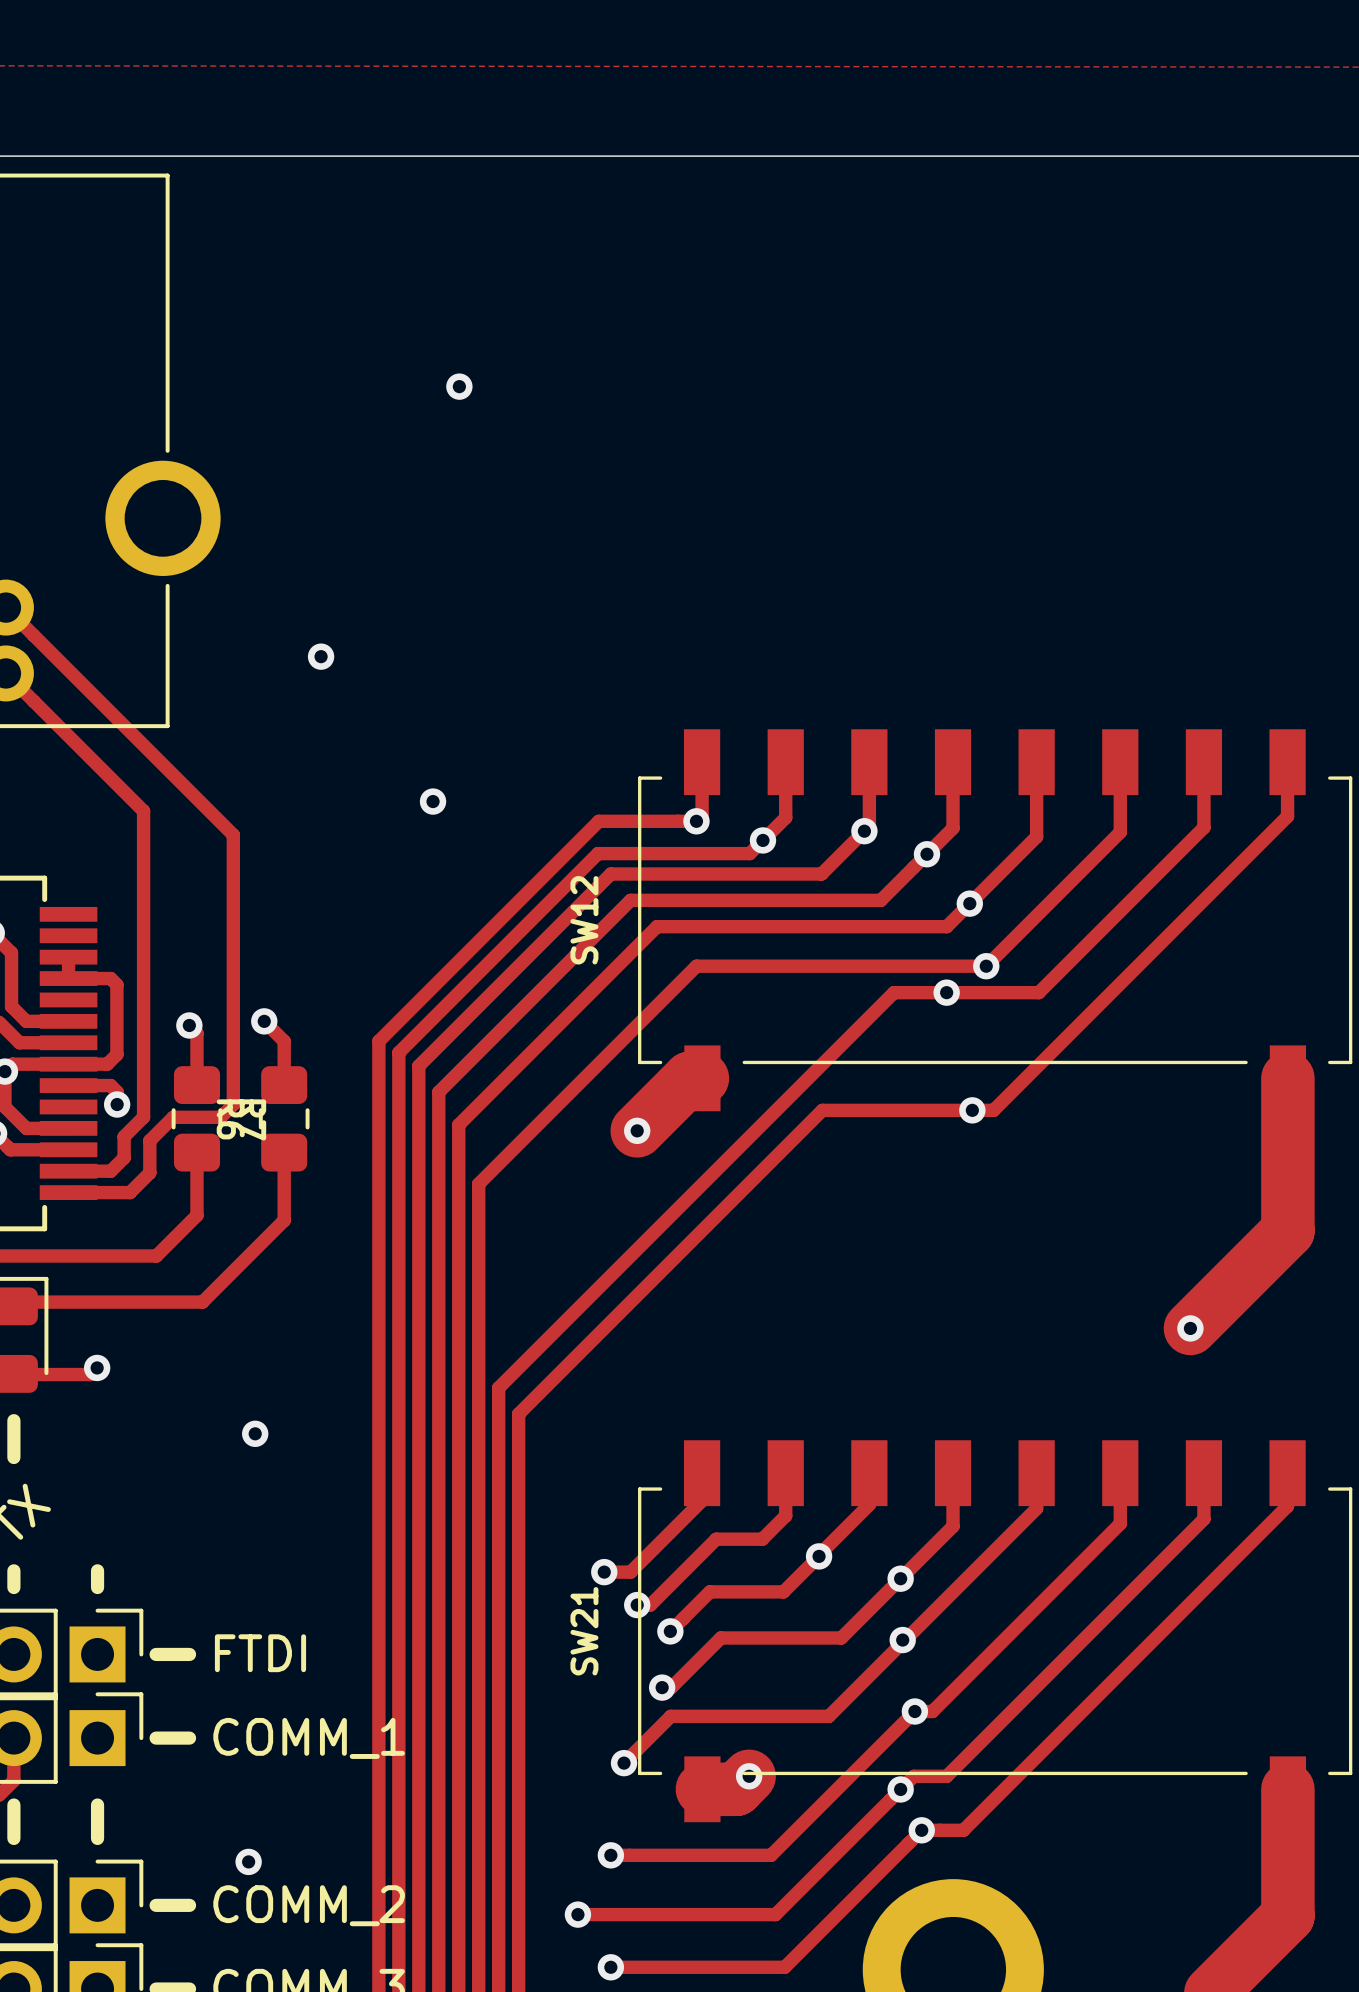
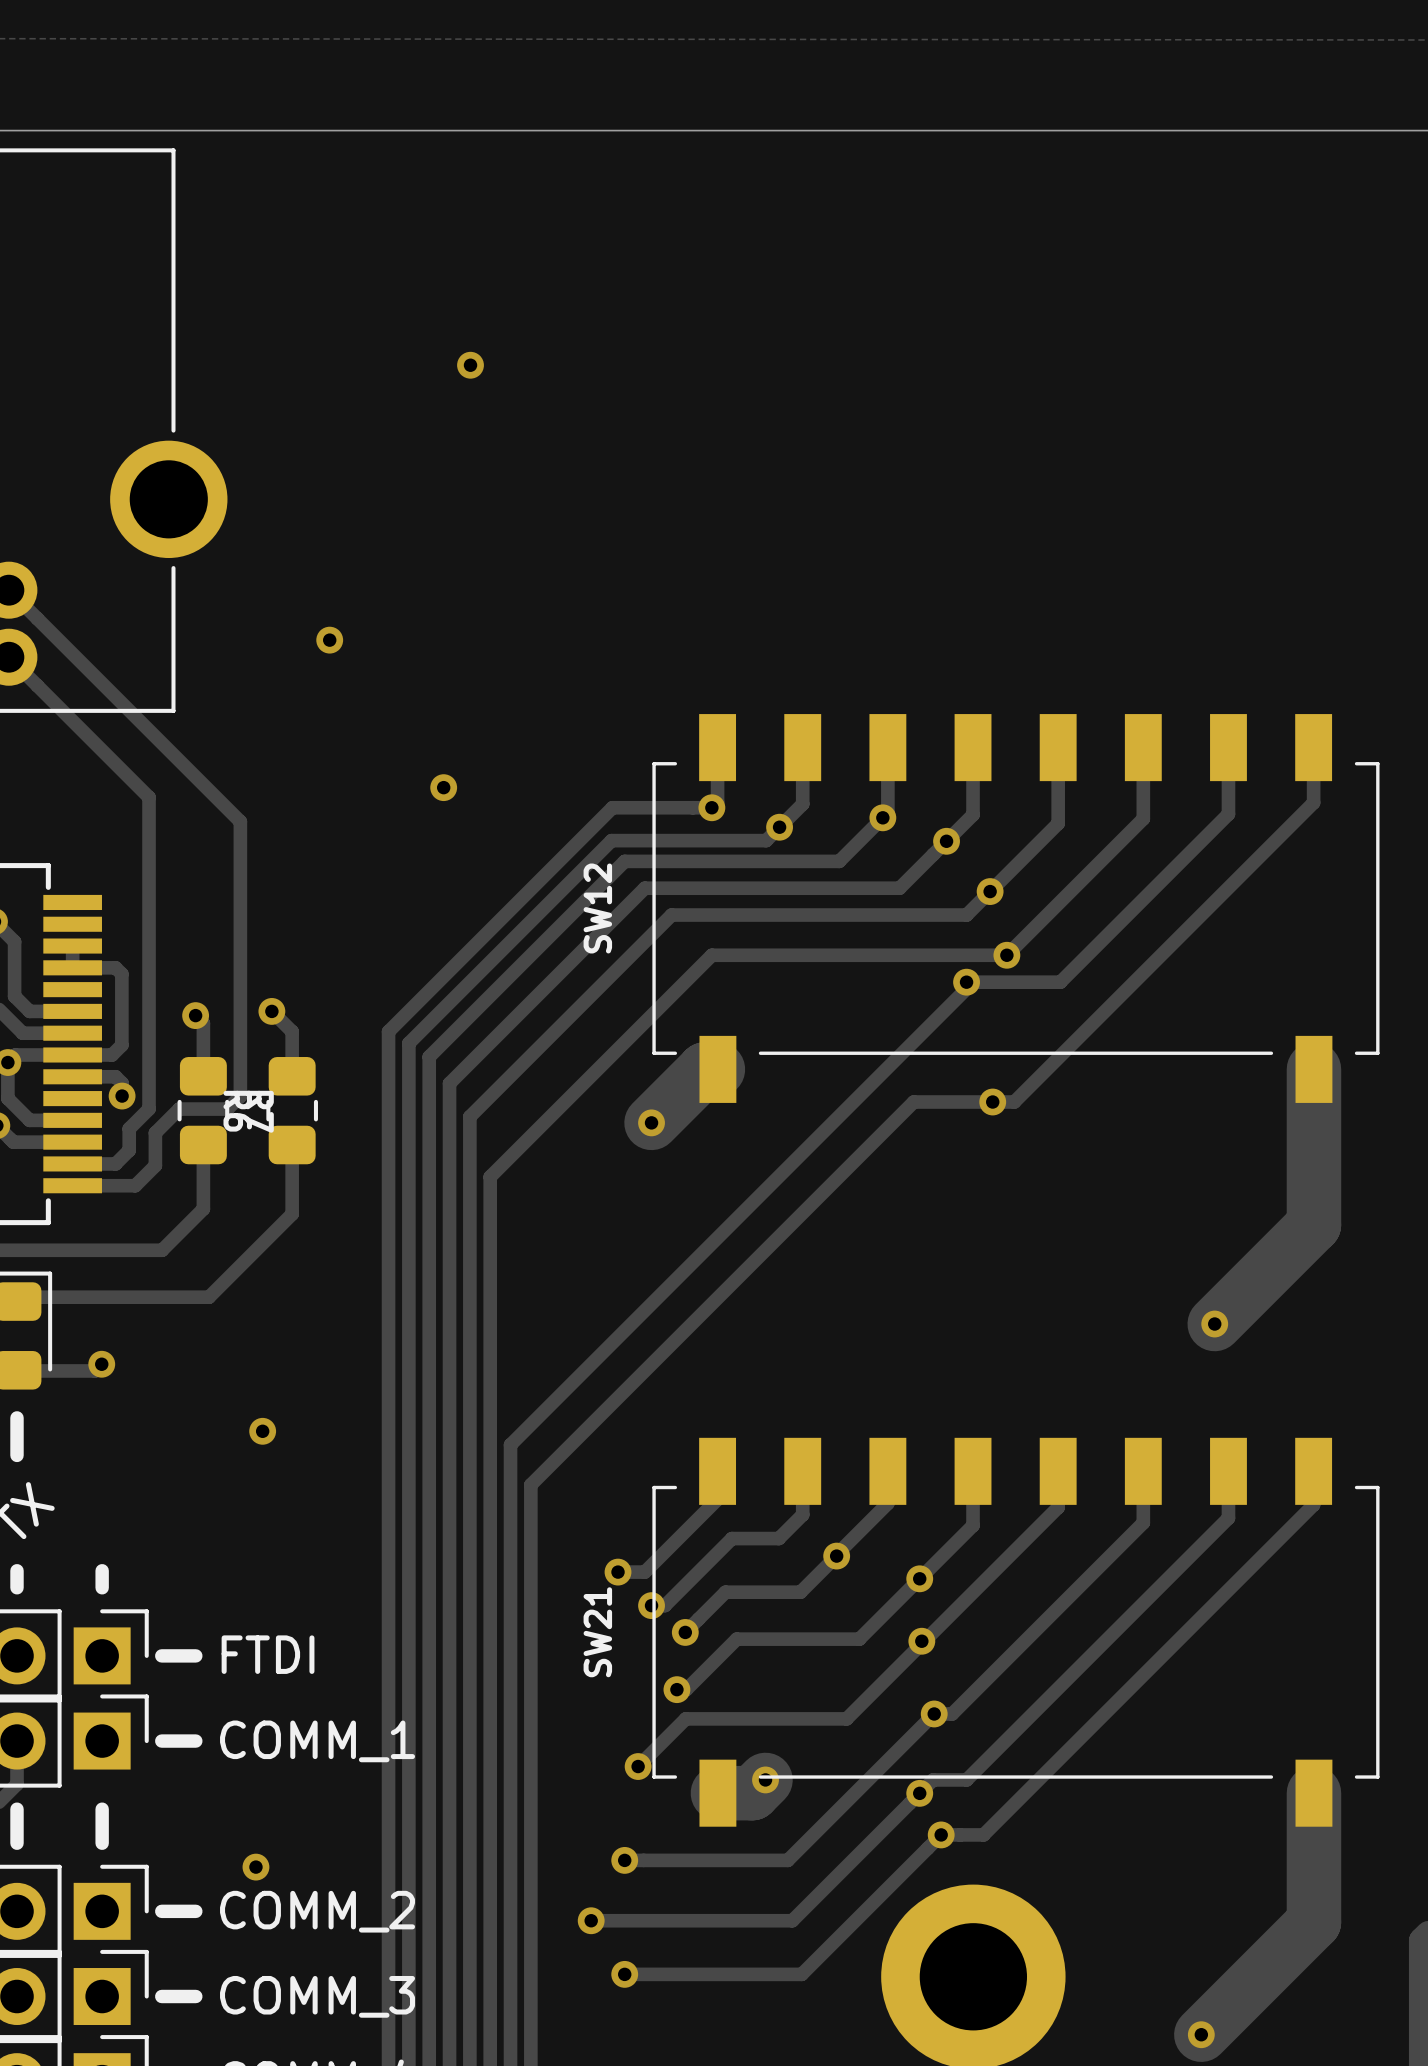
track: (946, 992) (893, 992) (498, 1387) (498, 1447) -> (966, 982) (966, 988) (510, 1444)
track: (894, 1110) (822, 1110) (518, 1414) (518, 1486) -> (913, 1102) (530, 1484)

